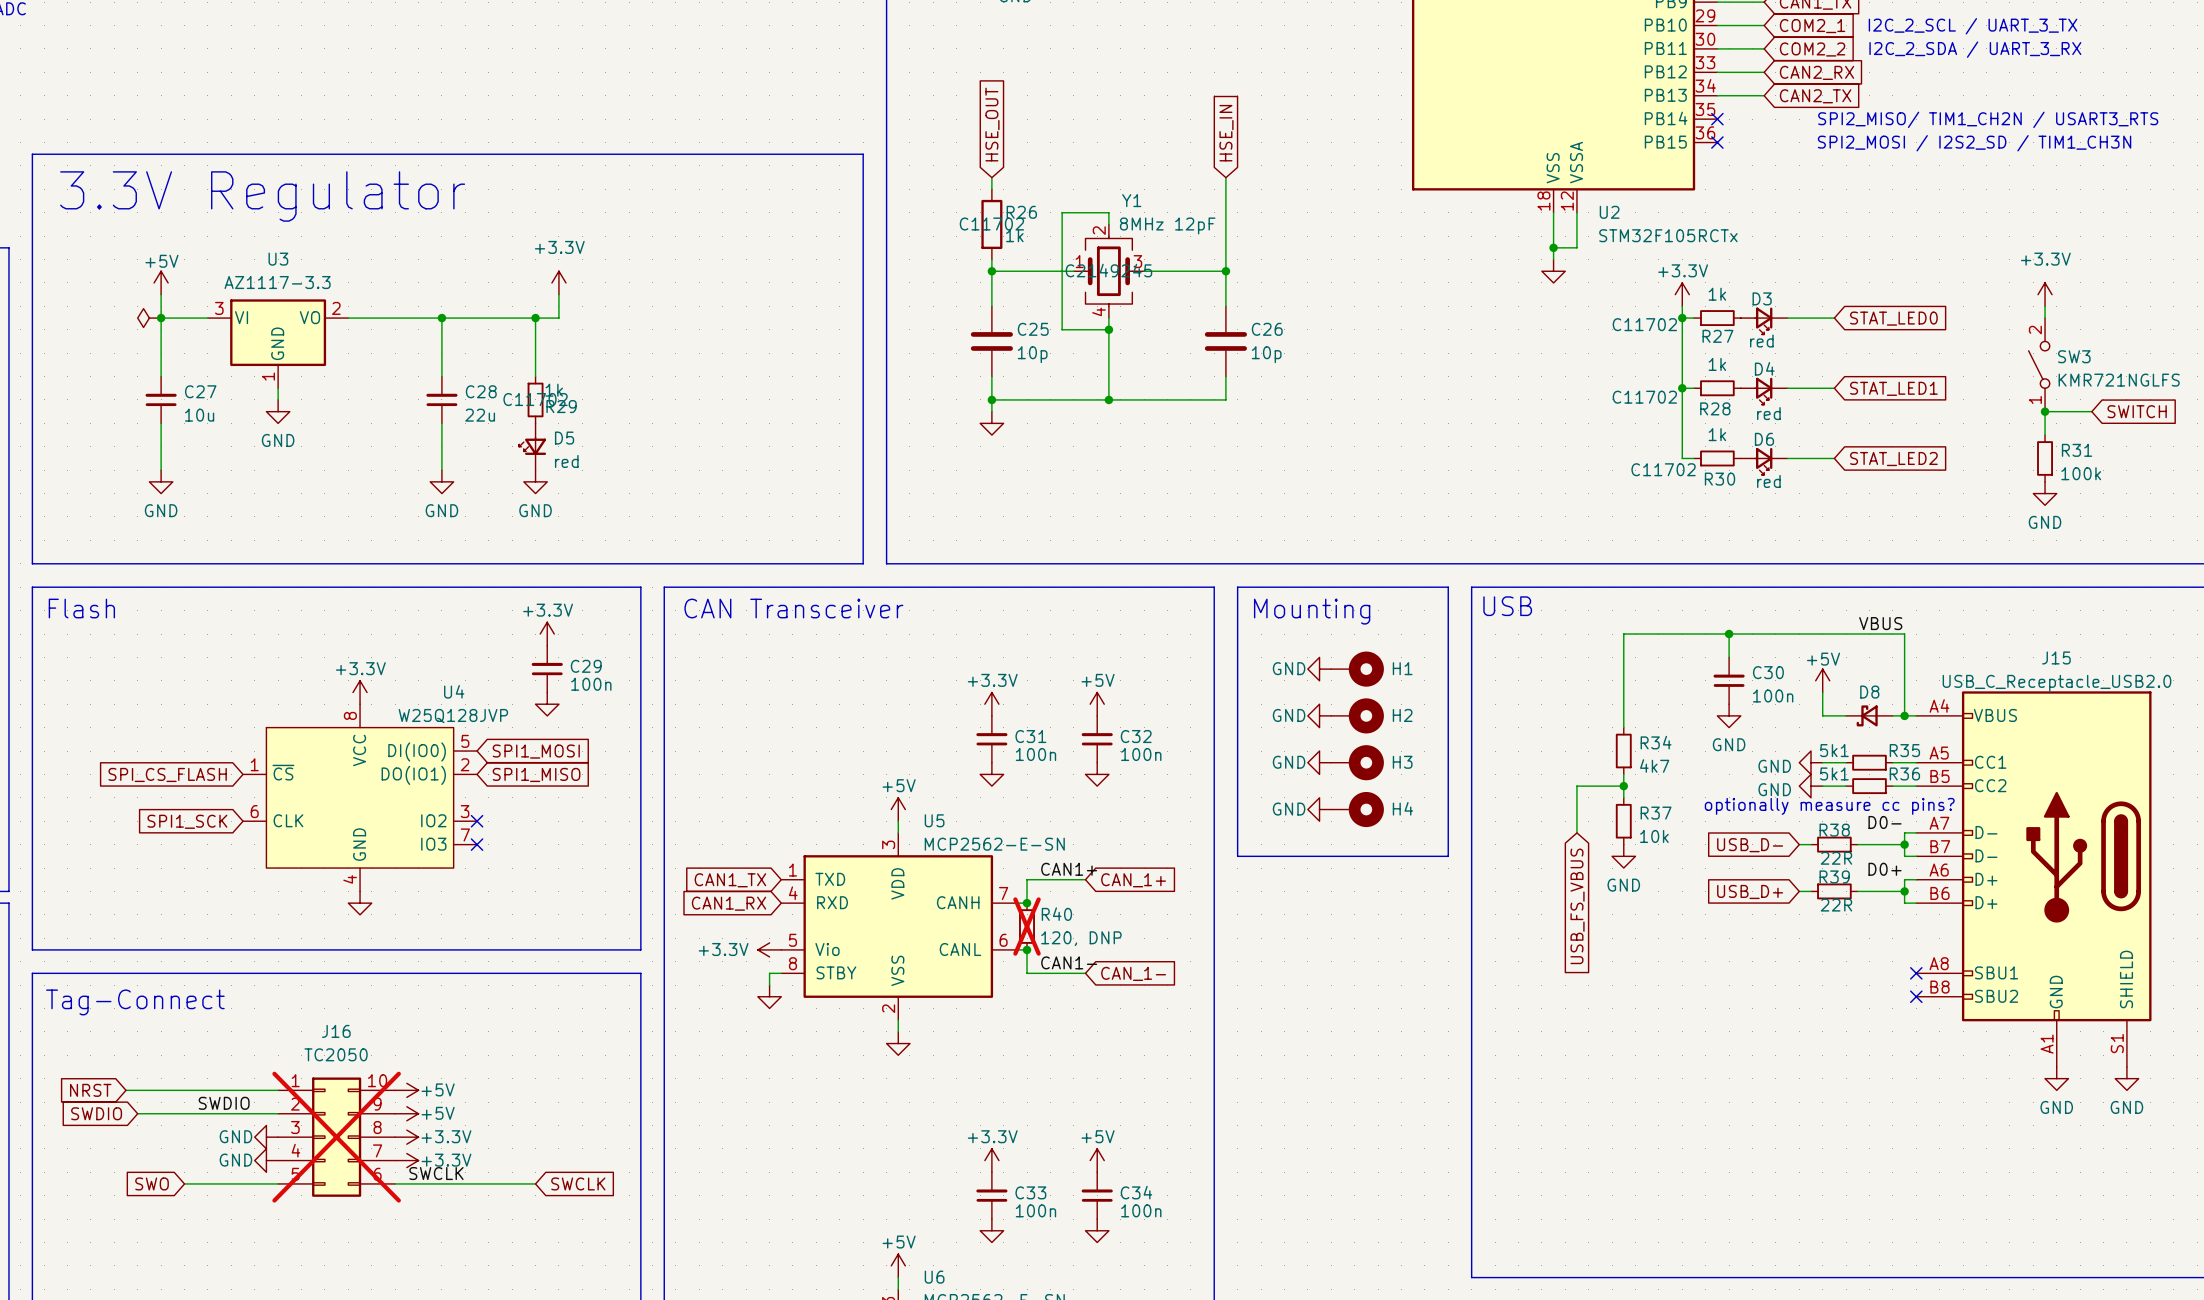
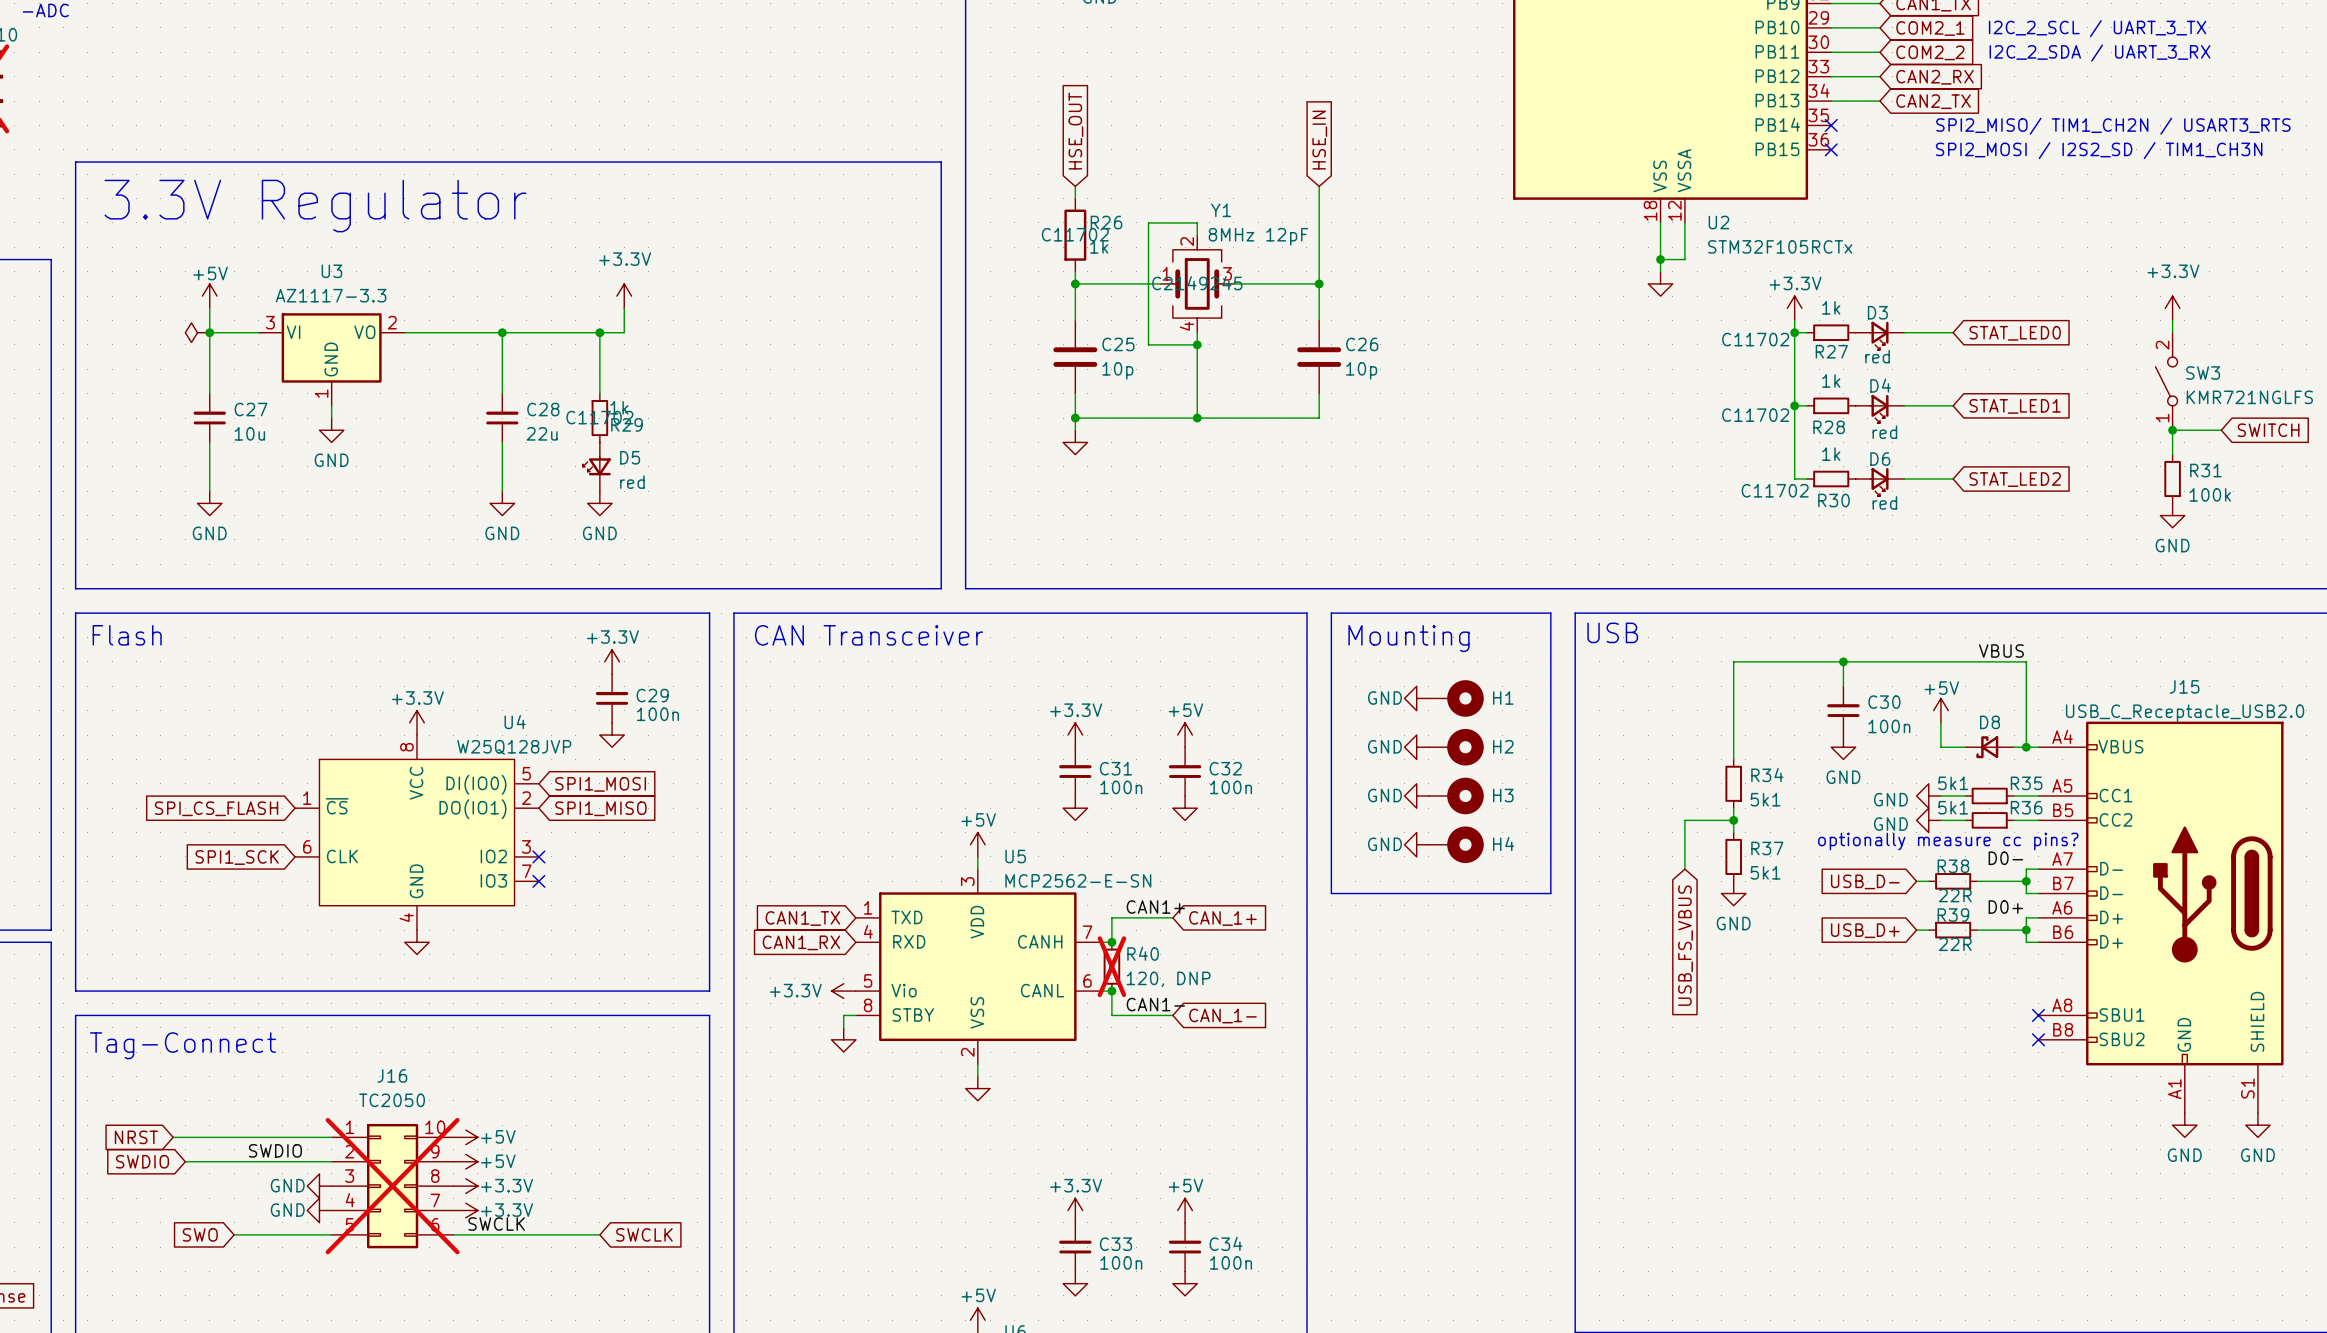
R34 value: 4k7 (1654, 765) -> 5k1 (1765, 799)
R37 value: 10k (1654, 836) -> 5k1 (1765, 872)

